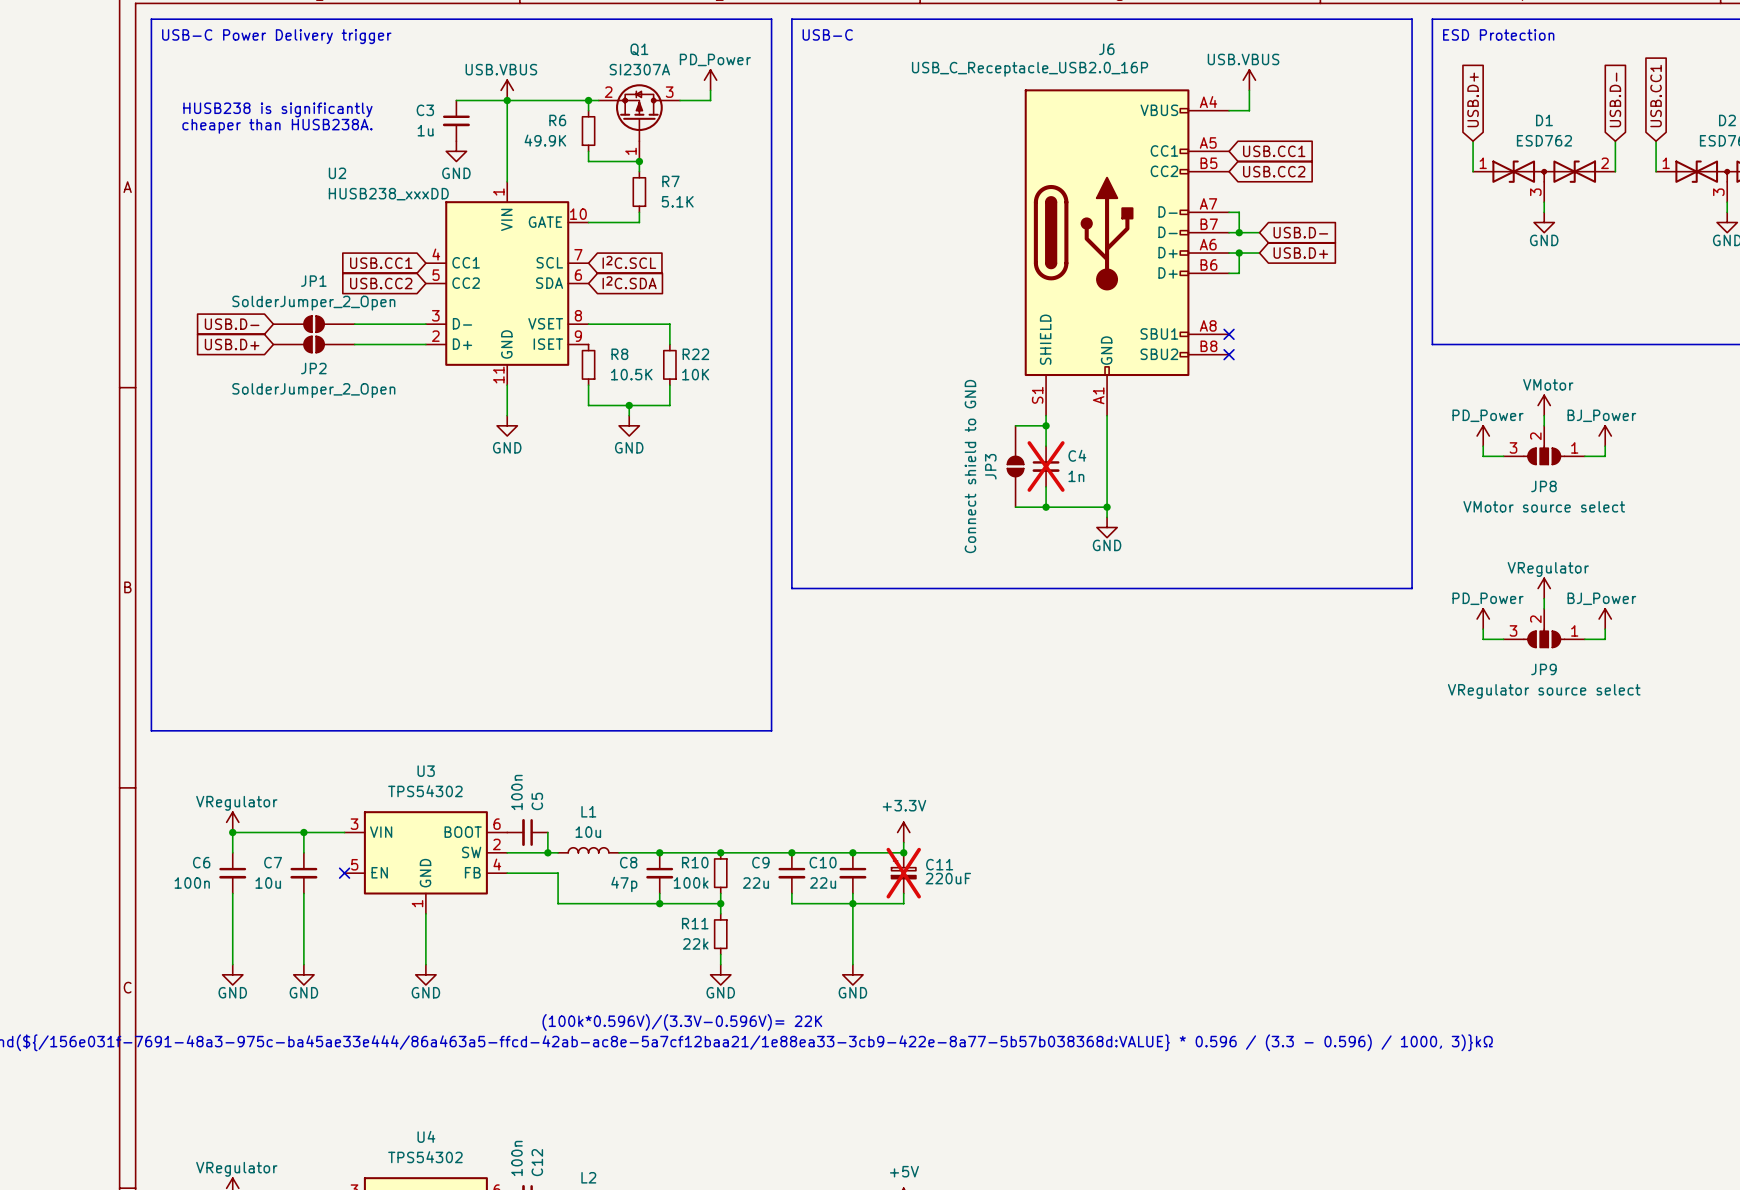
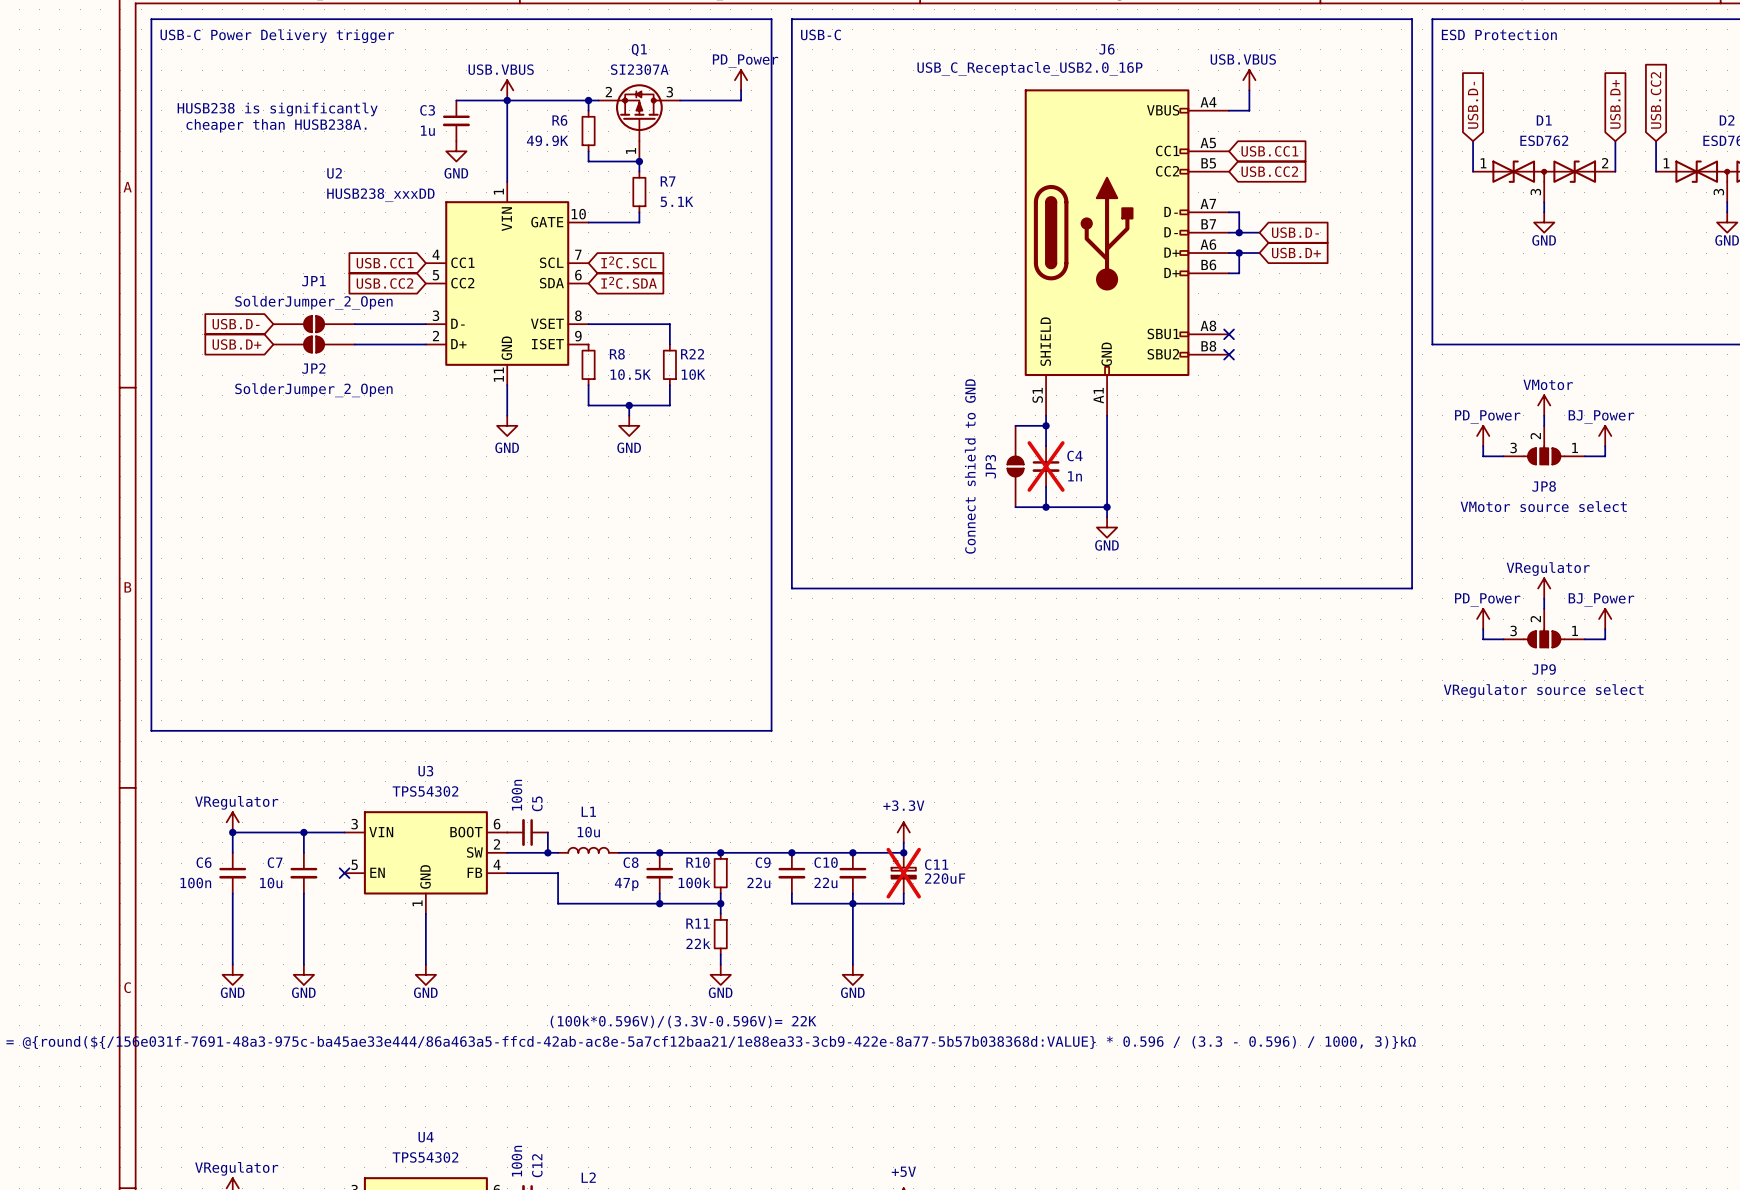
power symbol position: PD_Power (710, 80) -> PD_Power (741, 80)
wire: (710, 90) (710, 100) -> (741, 90) (741, 100) (710, 100)
global label: USB.CC1 (1656, 96) -> USB.CC2 (1656, 100)
global label: USB.D+ (1473, 99) -> USB.D- (1473, 105)
global label: USB.D- (1615, 99) -> USB.D+ (1615, 104)

